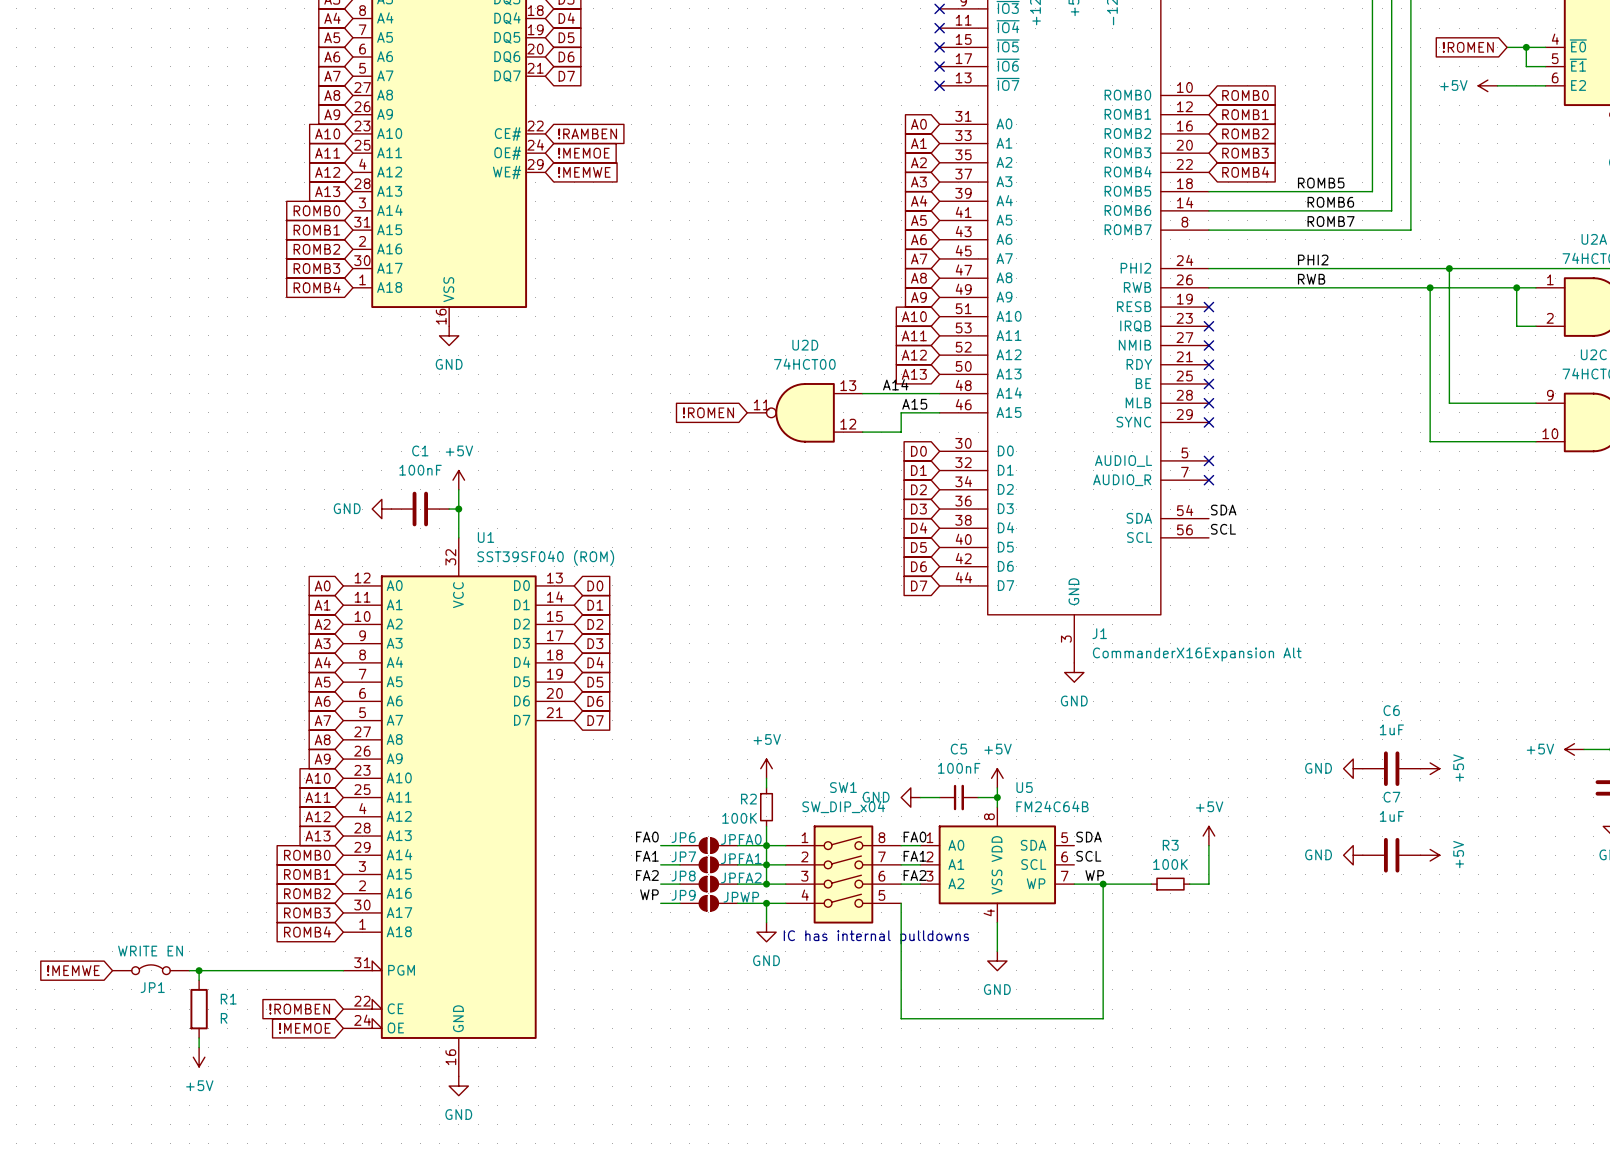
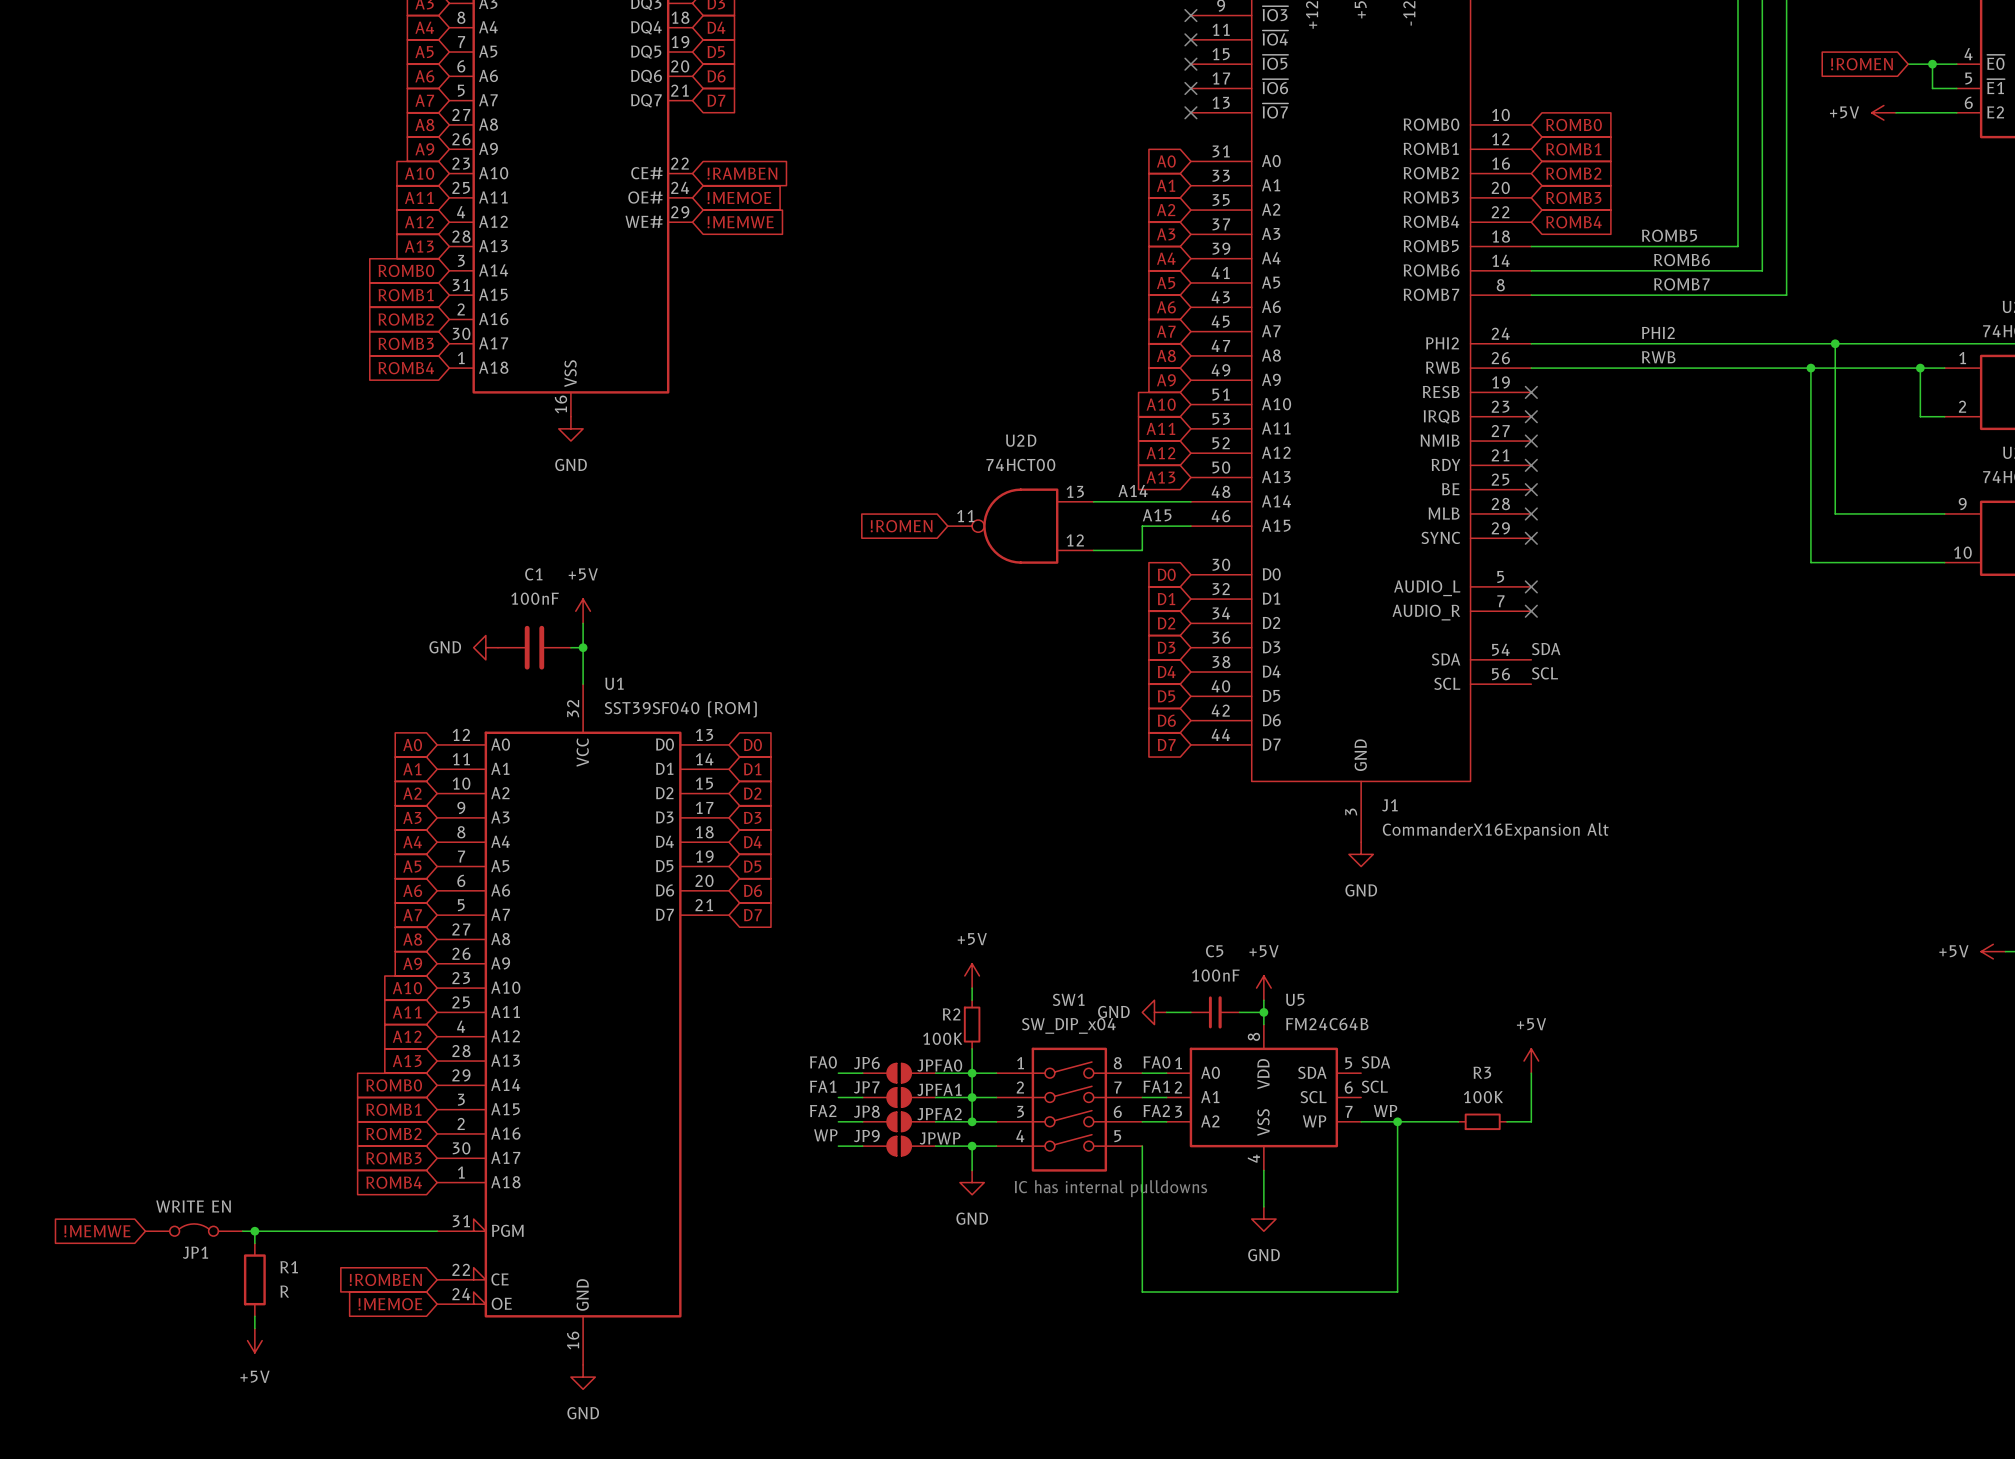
power symbol: GND (1353, 768) -> none
C6: 1uF (1391, 768) -> none
power symbol: +5V (1430, 768) -> none
power symbol: GND (1353, 855) -> none
C7: 1uF (1391, 855) -> none
power symbol: +5V (1430, 855) -> none

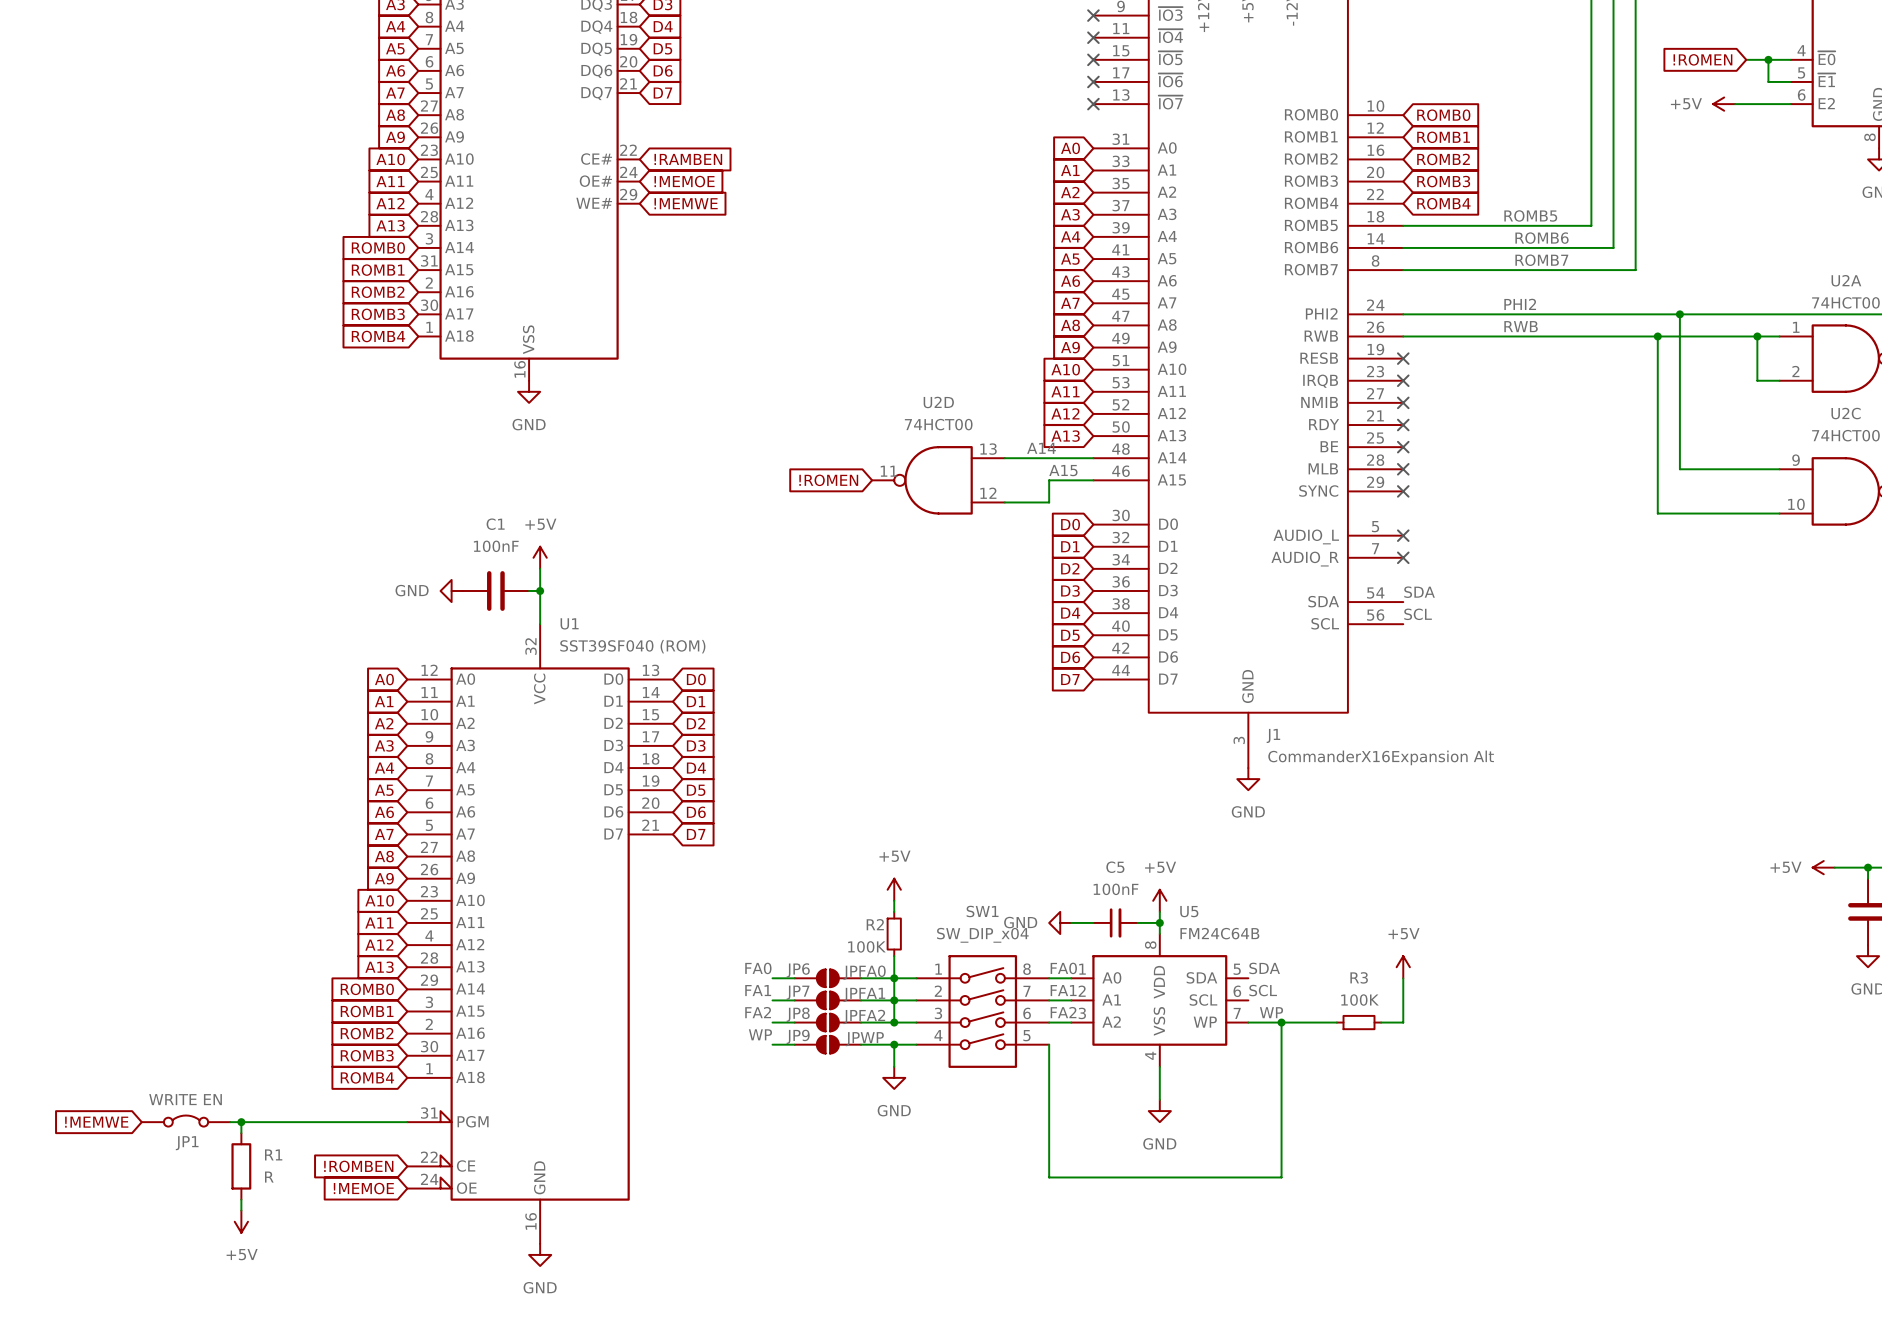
text: IC has internal pulldowns (1110, 1188) -> none

